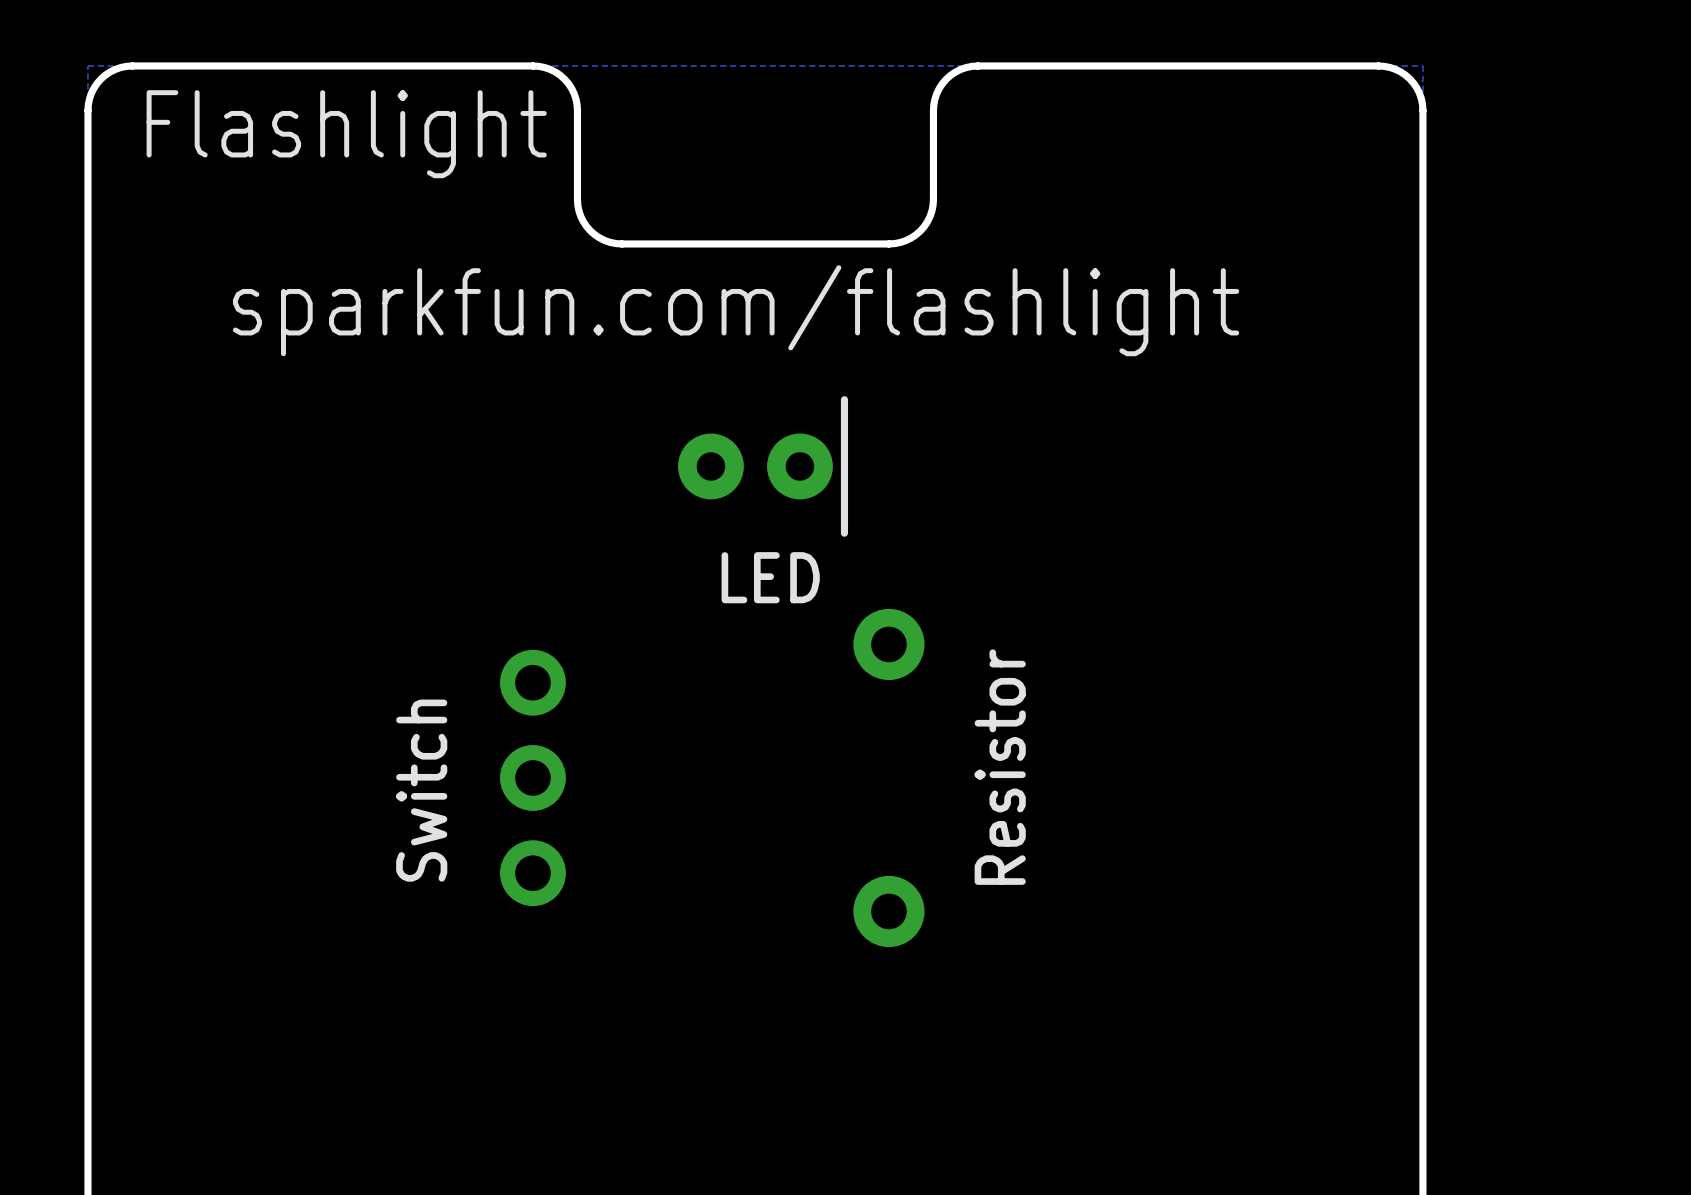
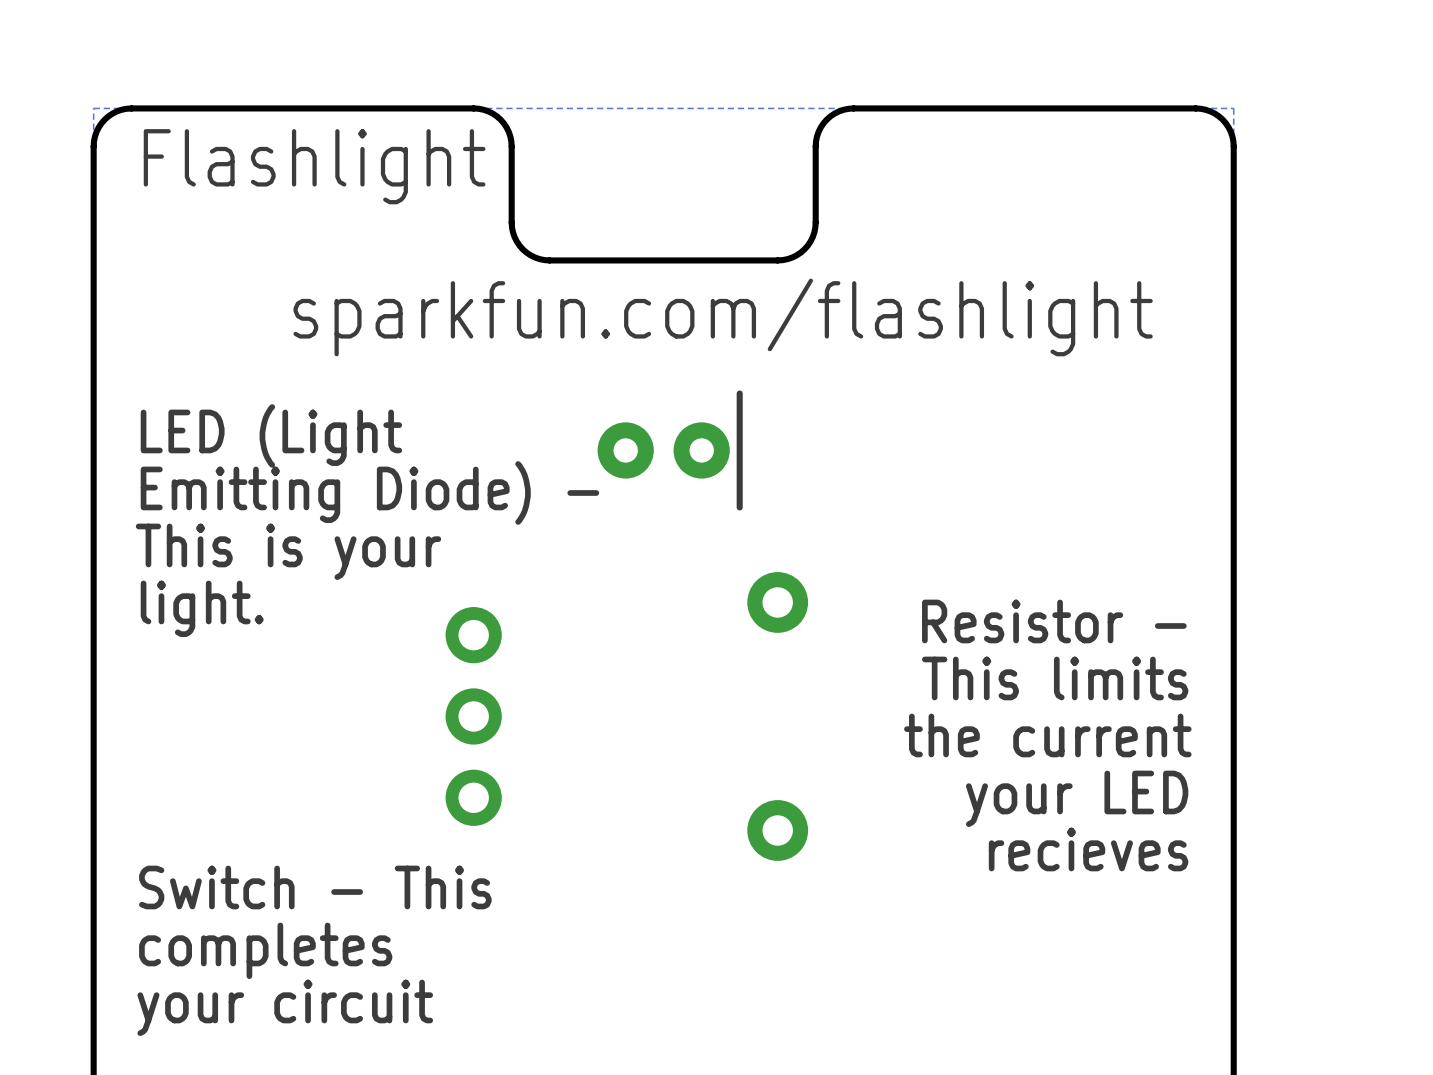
text position: sparkfun.com/flashlight (736, 310) -> sparkfun.com/flashlight (723, 317)
text: none -> LED (Light (271, 435)
text: none -> Emitting Diode) - (369, 492)
text: LED (770, 577) -> none
text: none -> This is your (288, 551)
text: none -> light. (202, 608)
text: none -> This limits (1055, 678)
text: Resistor (1000, 767) -> Resistor - (1054, 621)
text: Switch (421, 790) -> Switch - This (315, 887)
text: none -> the current (1047, 735)
text: none -> your LED (1077, 798)
text: none -> recieves (1088, 849)
text: none -> completes (265, 950)
text: none -> your circuit (285, 1007)

